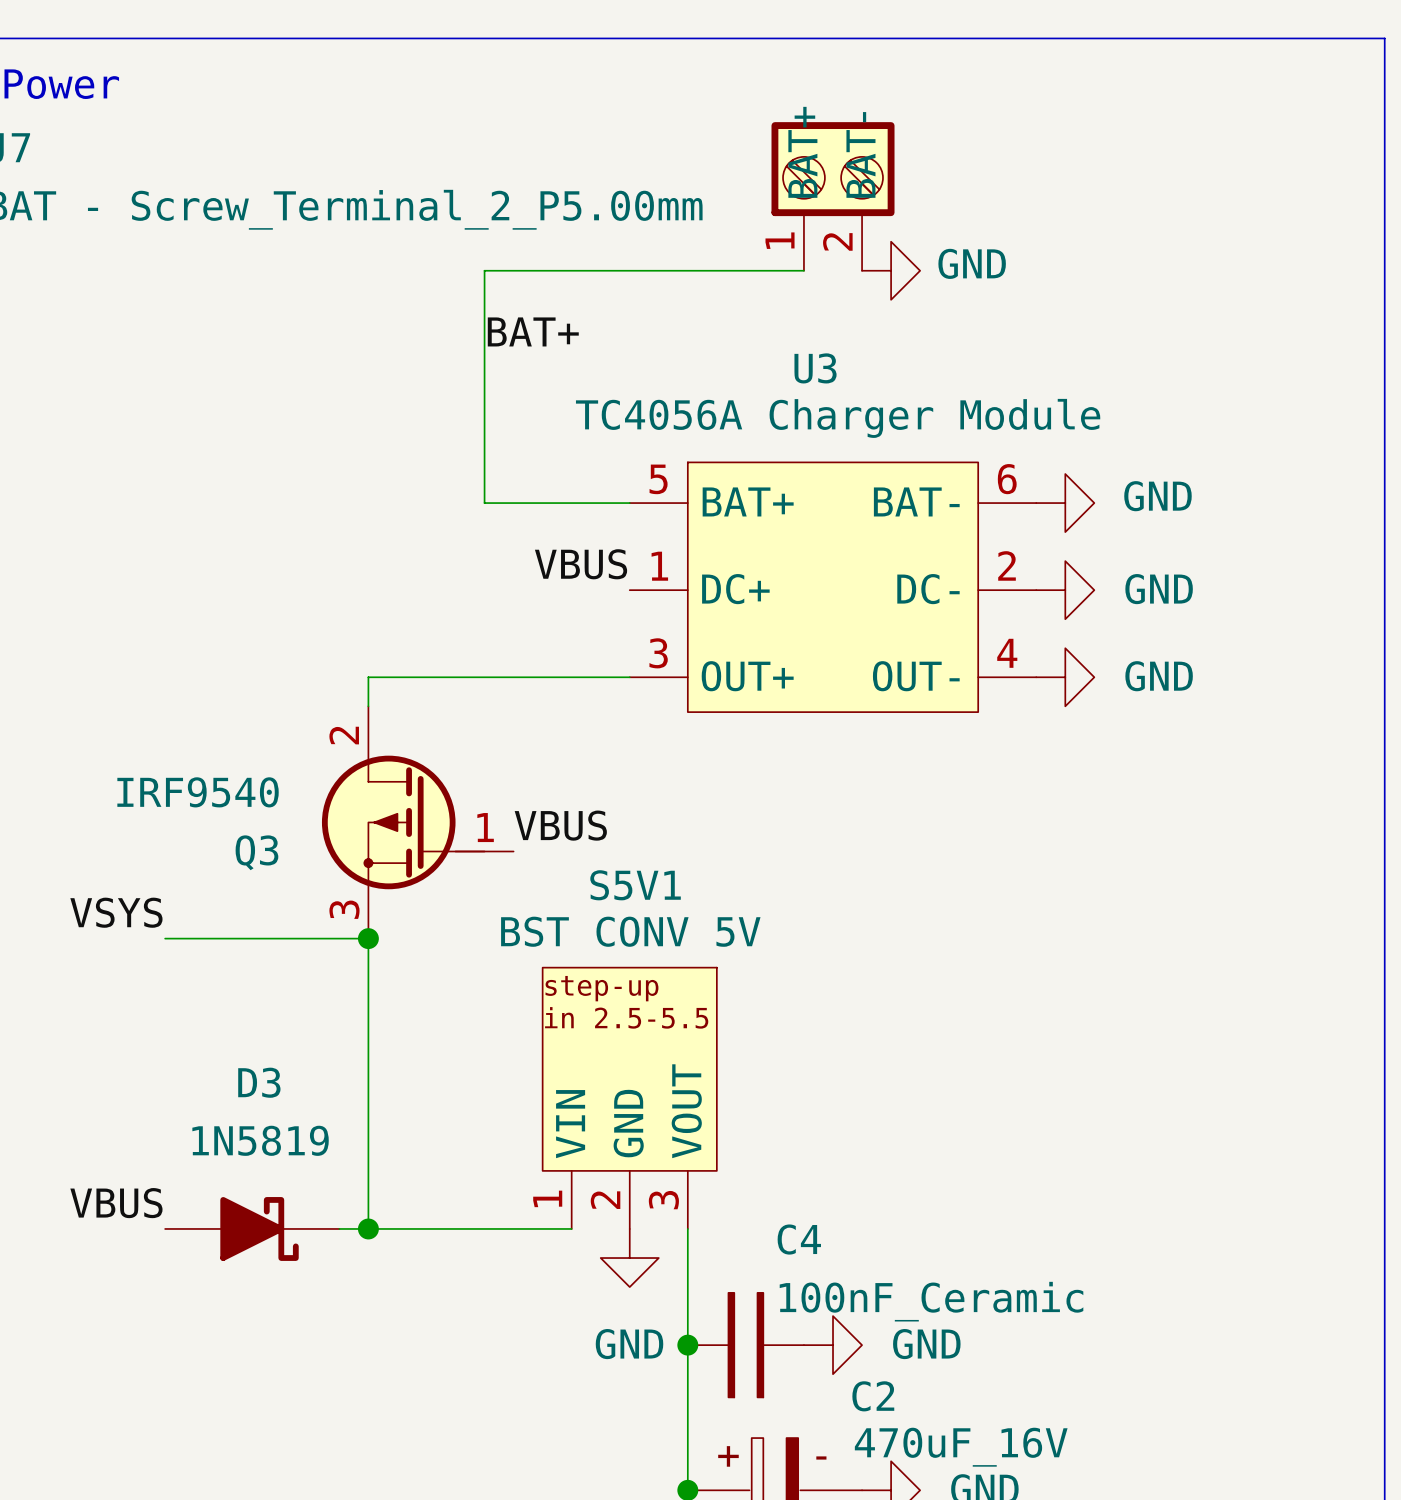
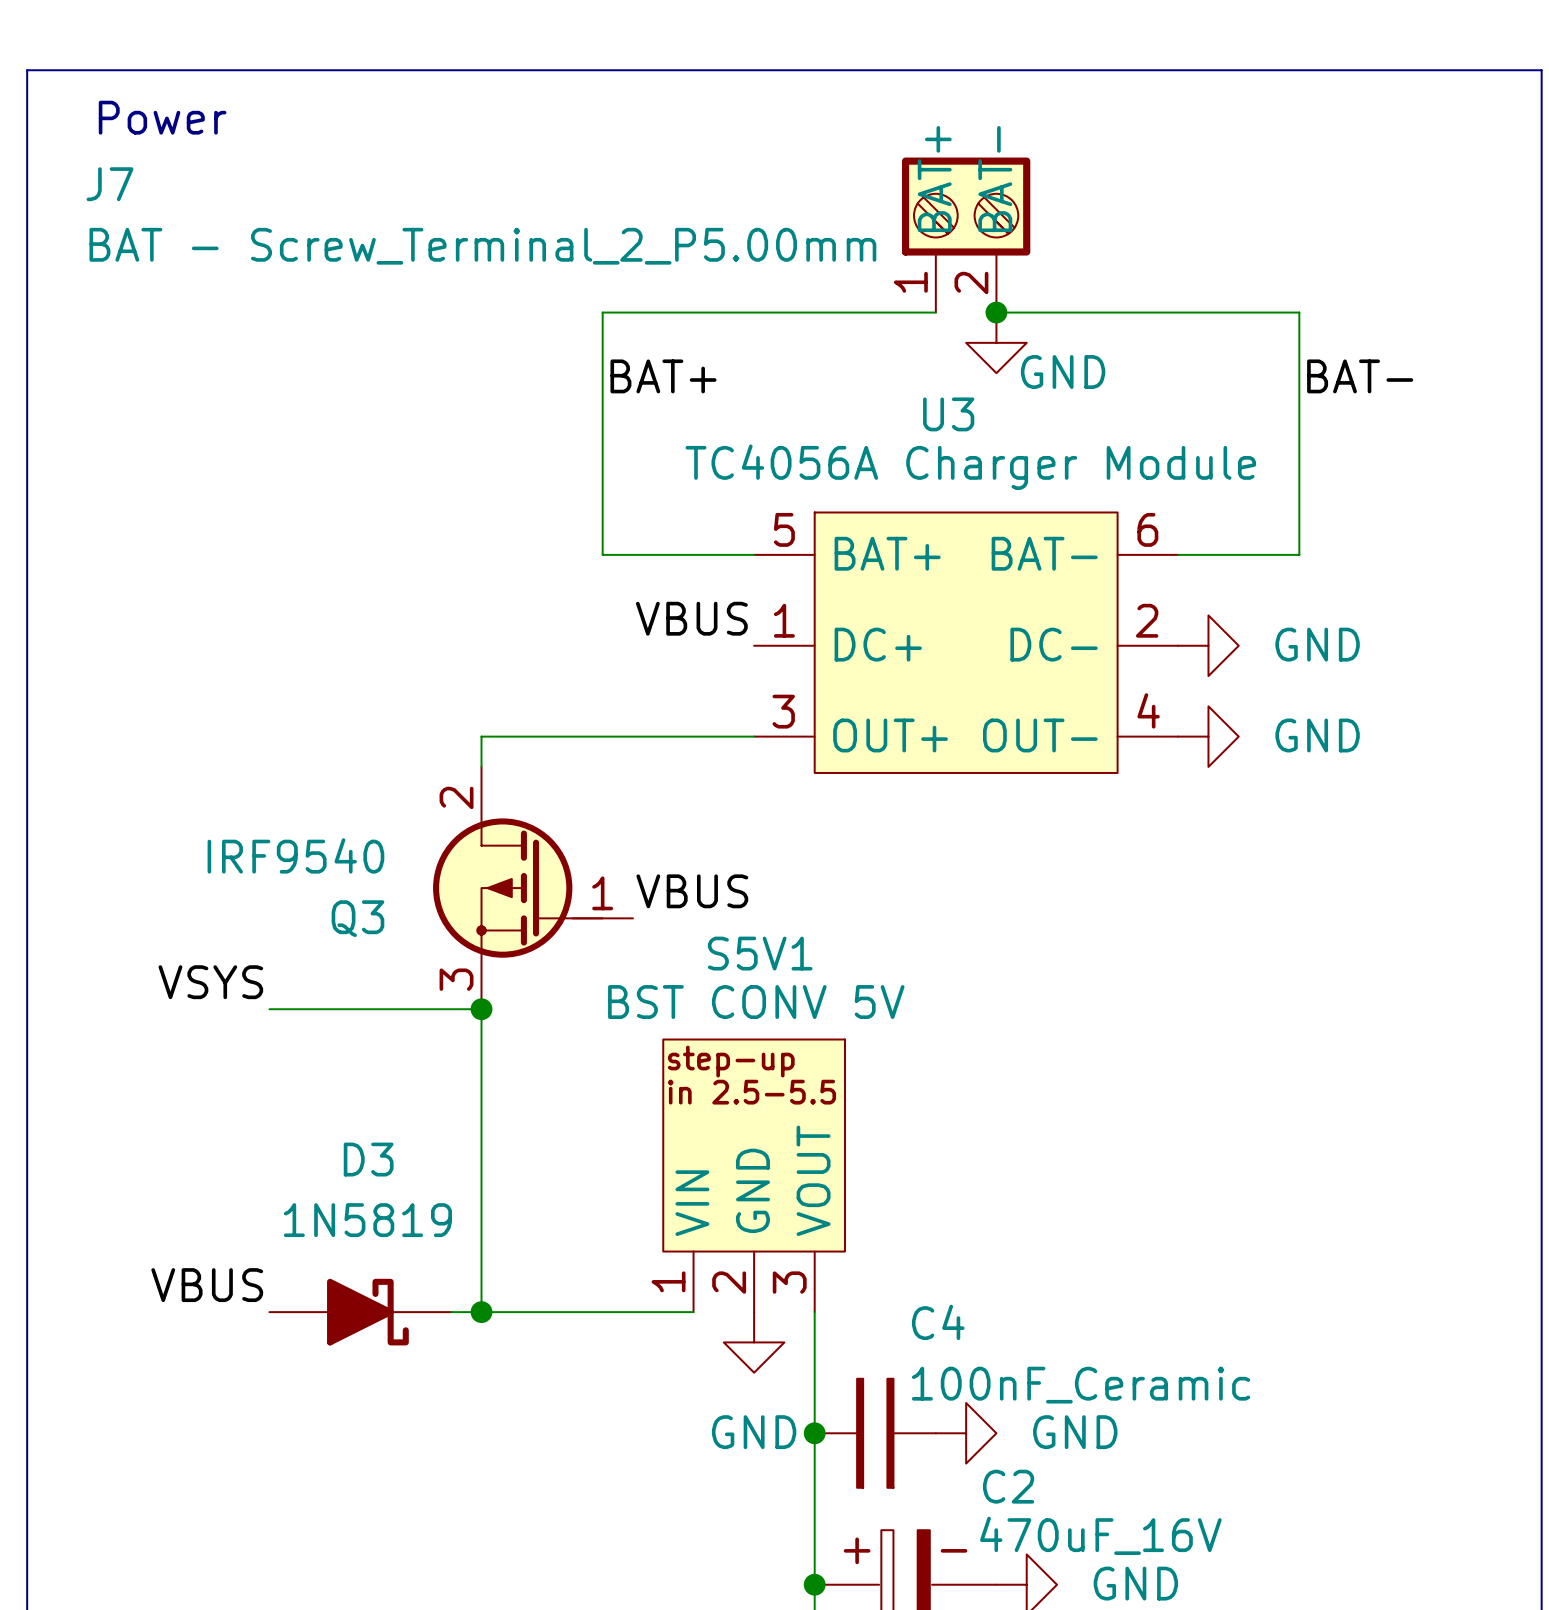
wire: none -> (996, 312) (1299, 312) (1299, 554) (1178, 554)
junction: none -> (996, 312)
power symbol rotation: 0° (891, 270) -> 90° clockwise (996, 342)
power symbol position: GND (891, 270) -> GND (996, 342)
label: none -> BAT- (1360, 376)
power symbol: GND (1065, 503) -> none

